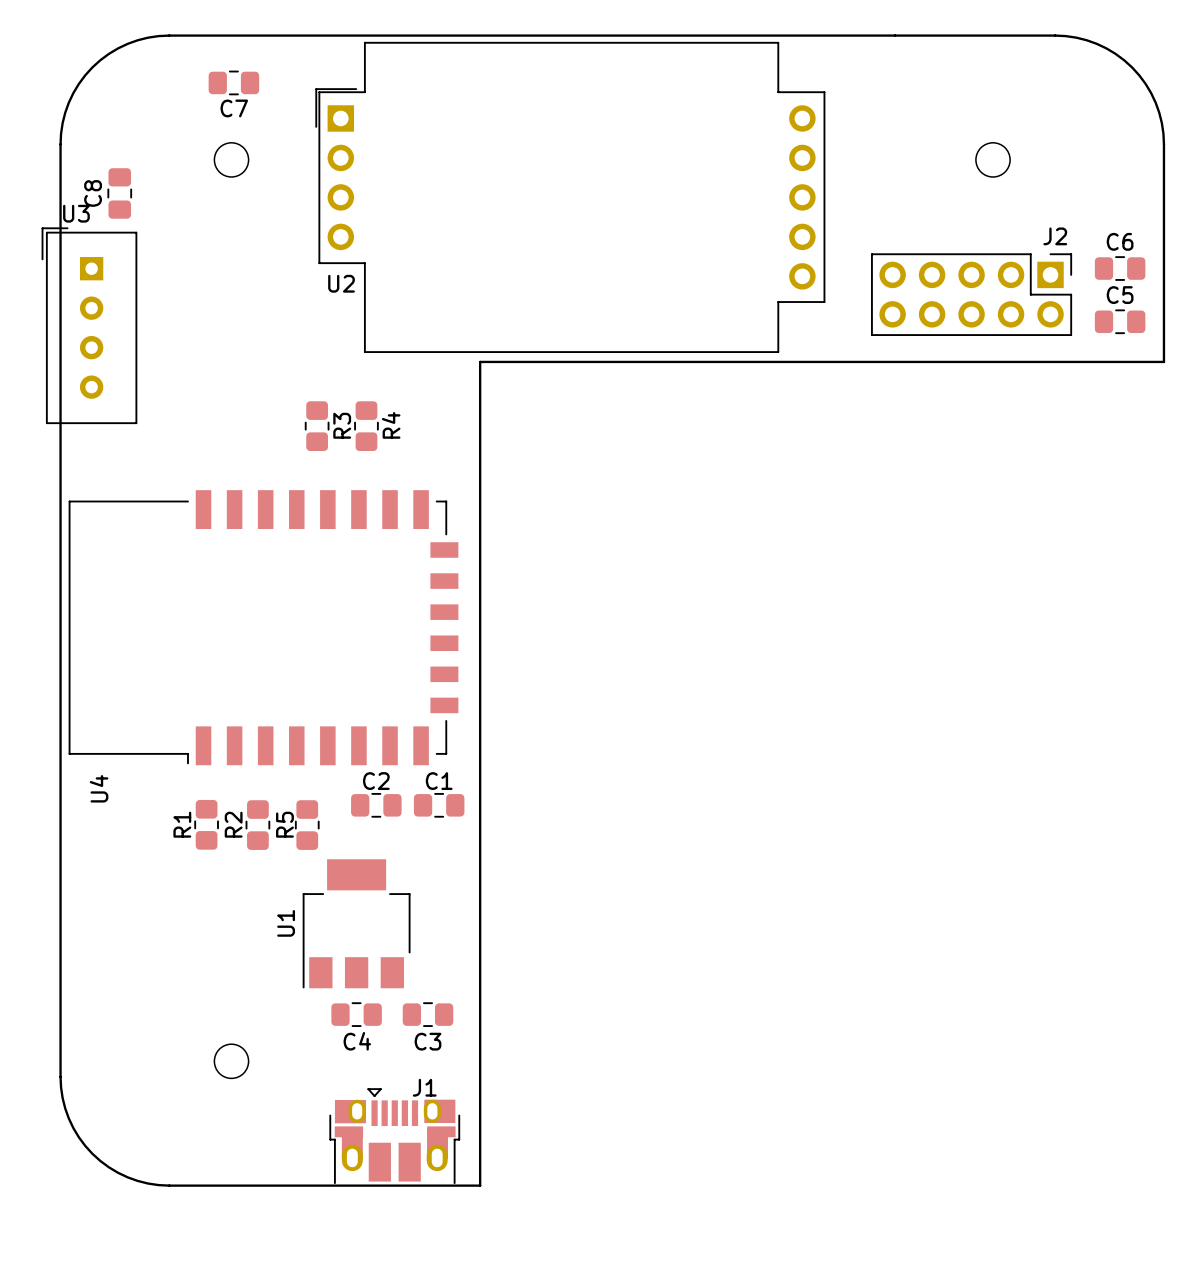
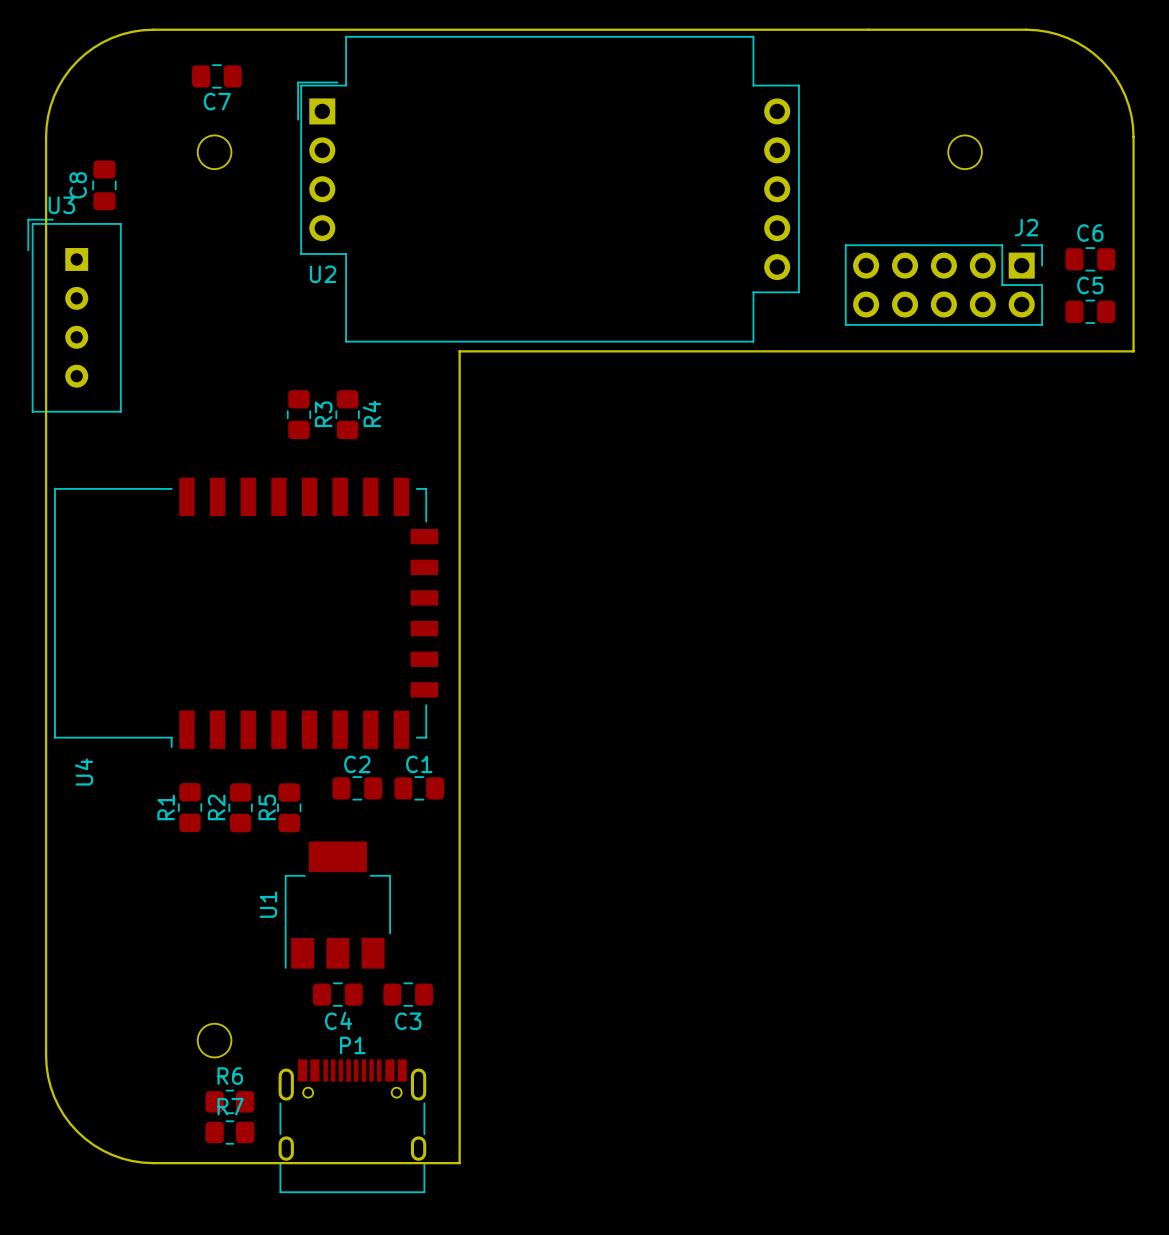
R6: none -> (229, 1101)
J1: (394, 1136) -> none
P1: none -> (352, 1126)
R7: none -> (229, 1132)

